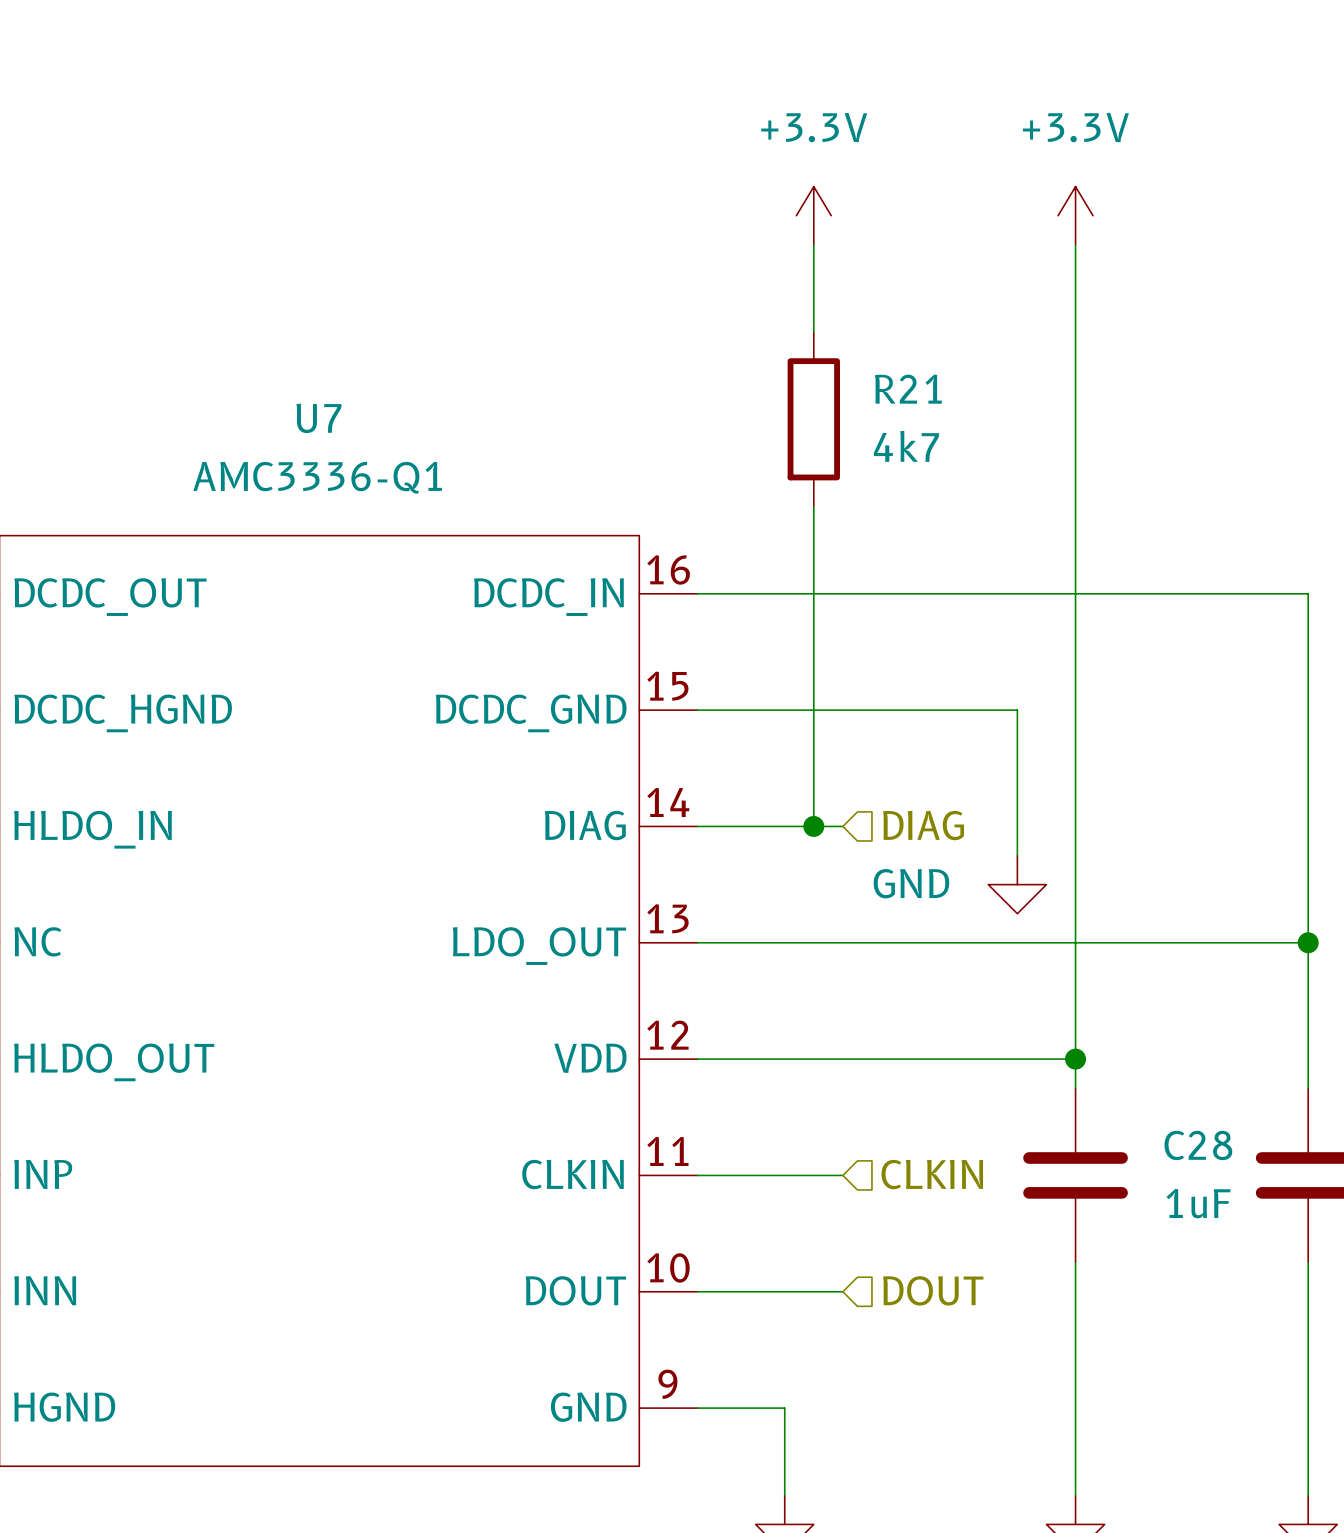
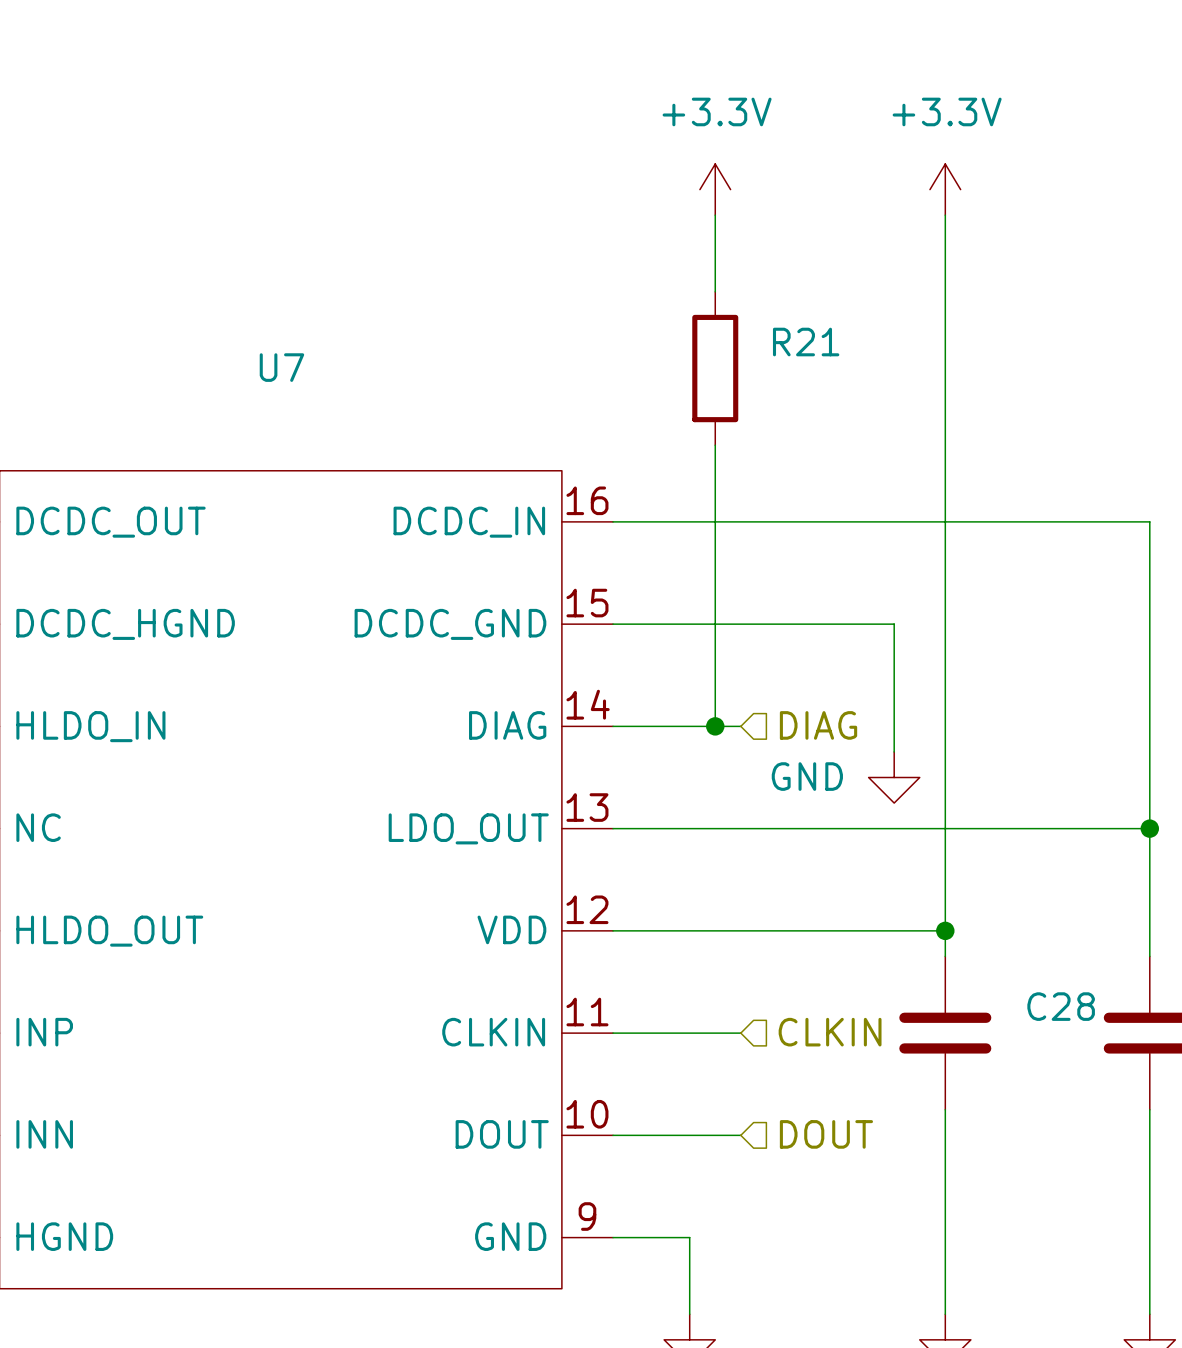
R21 value: 4k7 (906, 446) -> none
U7 value: AMC3336-Q1 (317, 477) -> none
C28 value: 1uF (1198, 1203) -> none

